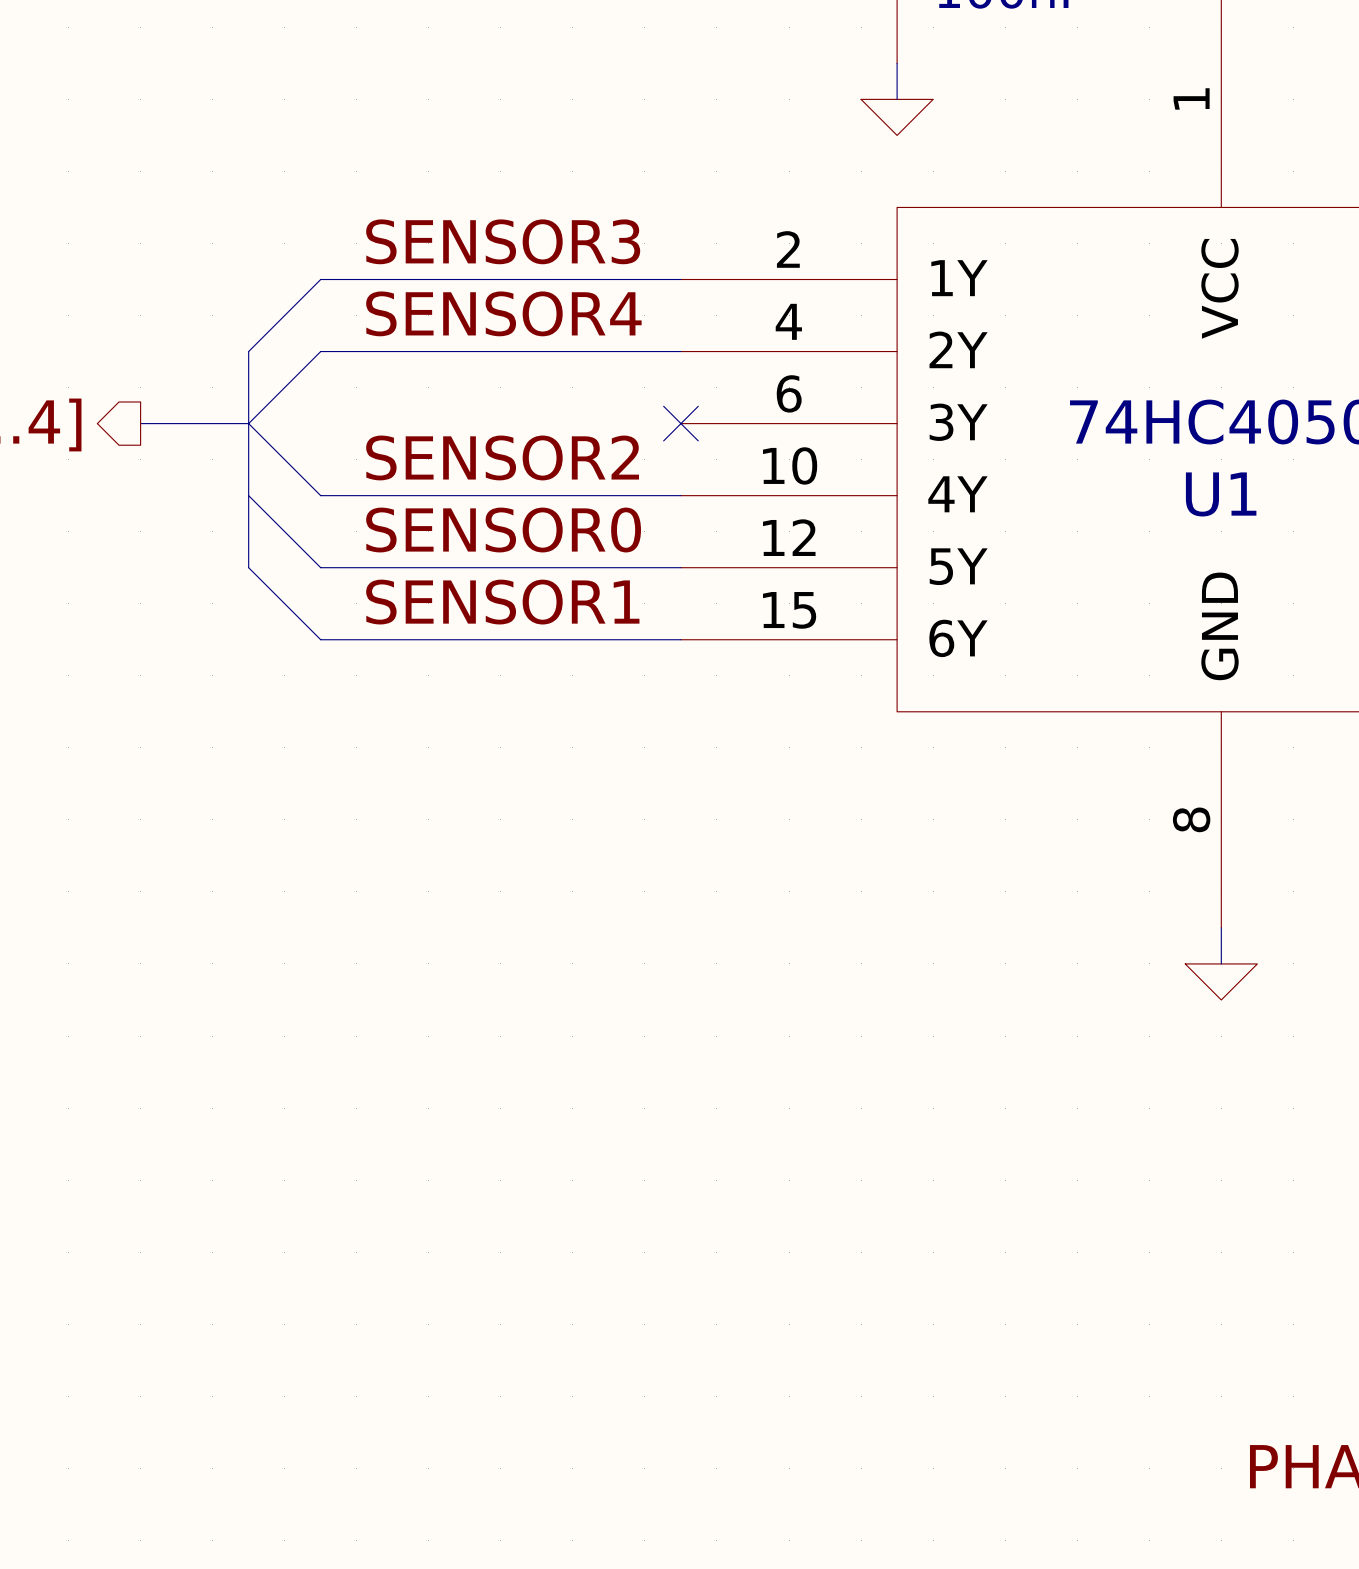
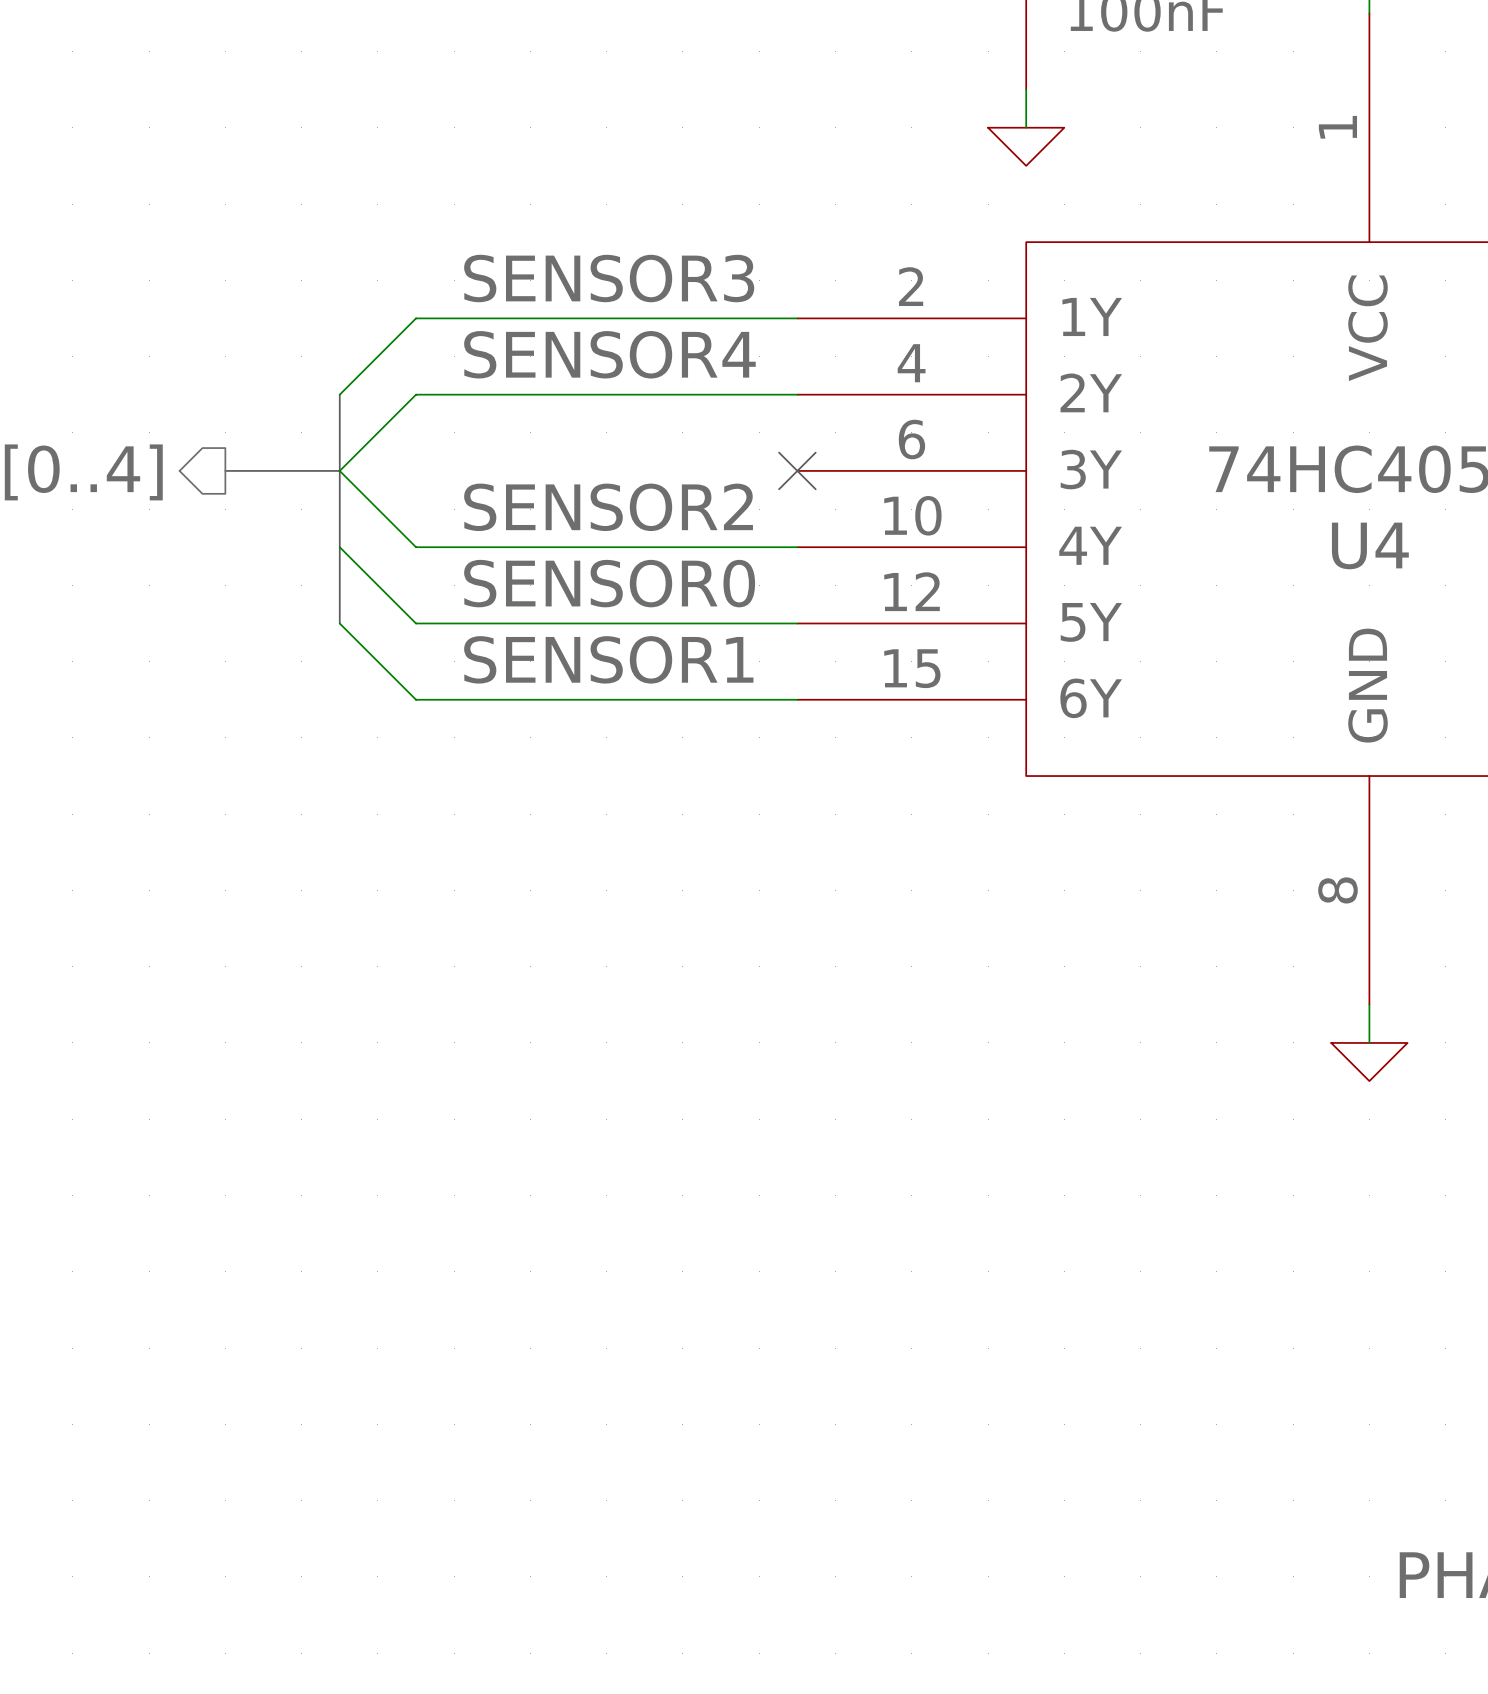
U1 name: U1 (1221, 494) -> U4 (1370, 545)

